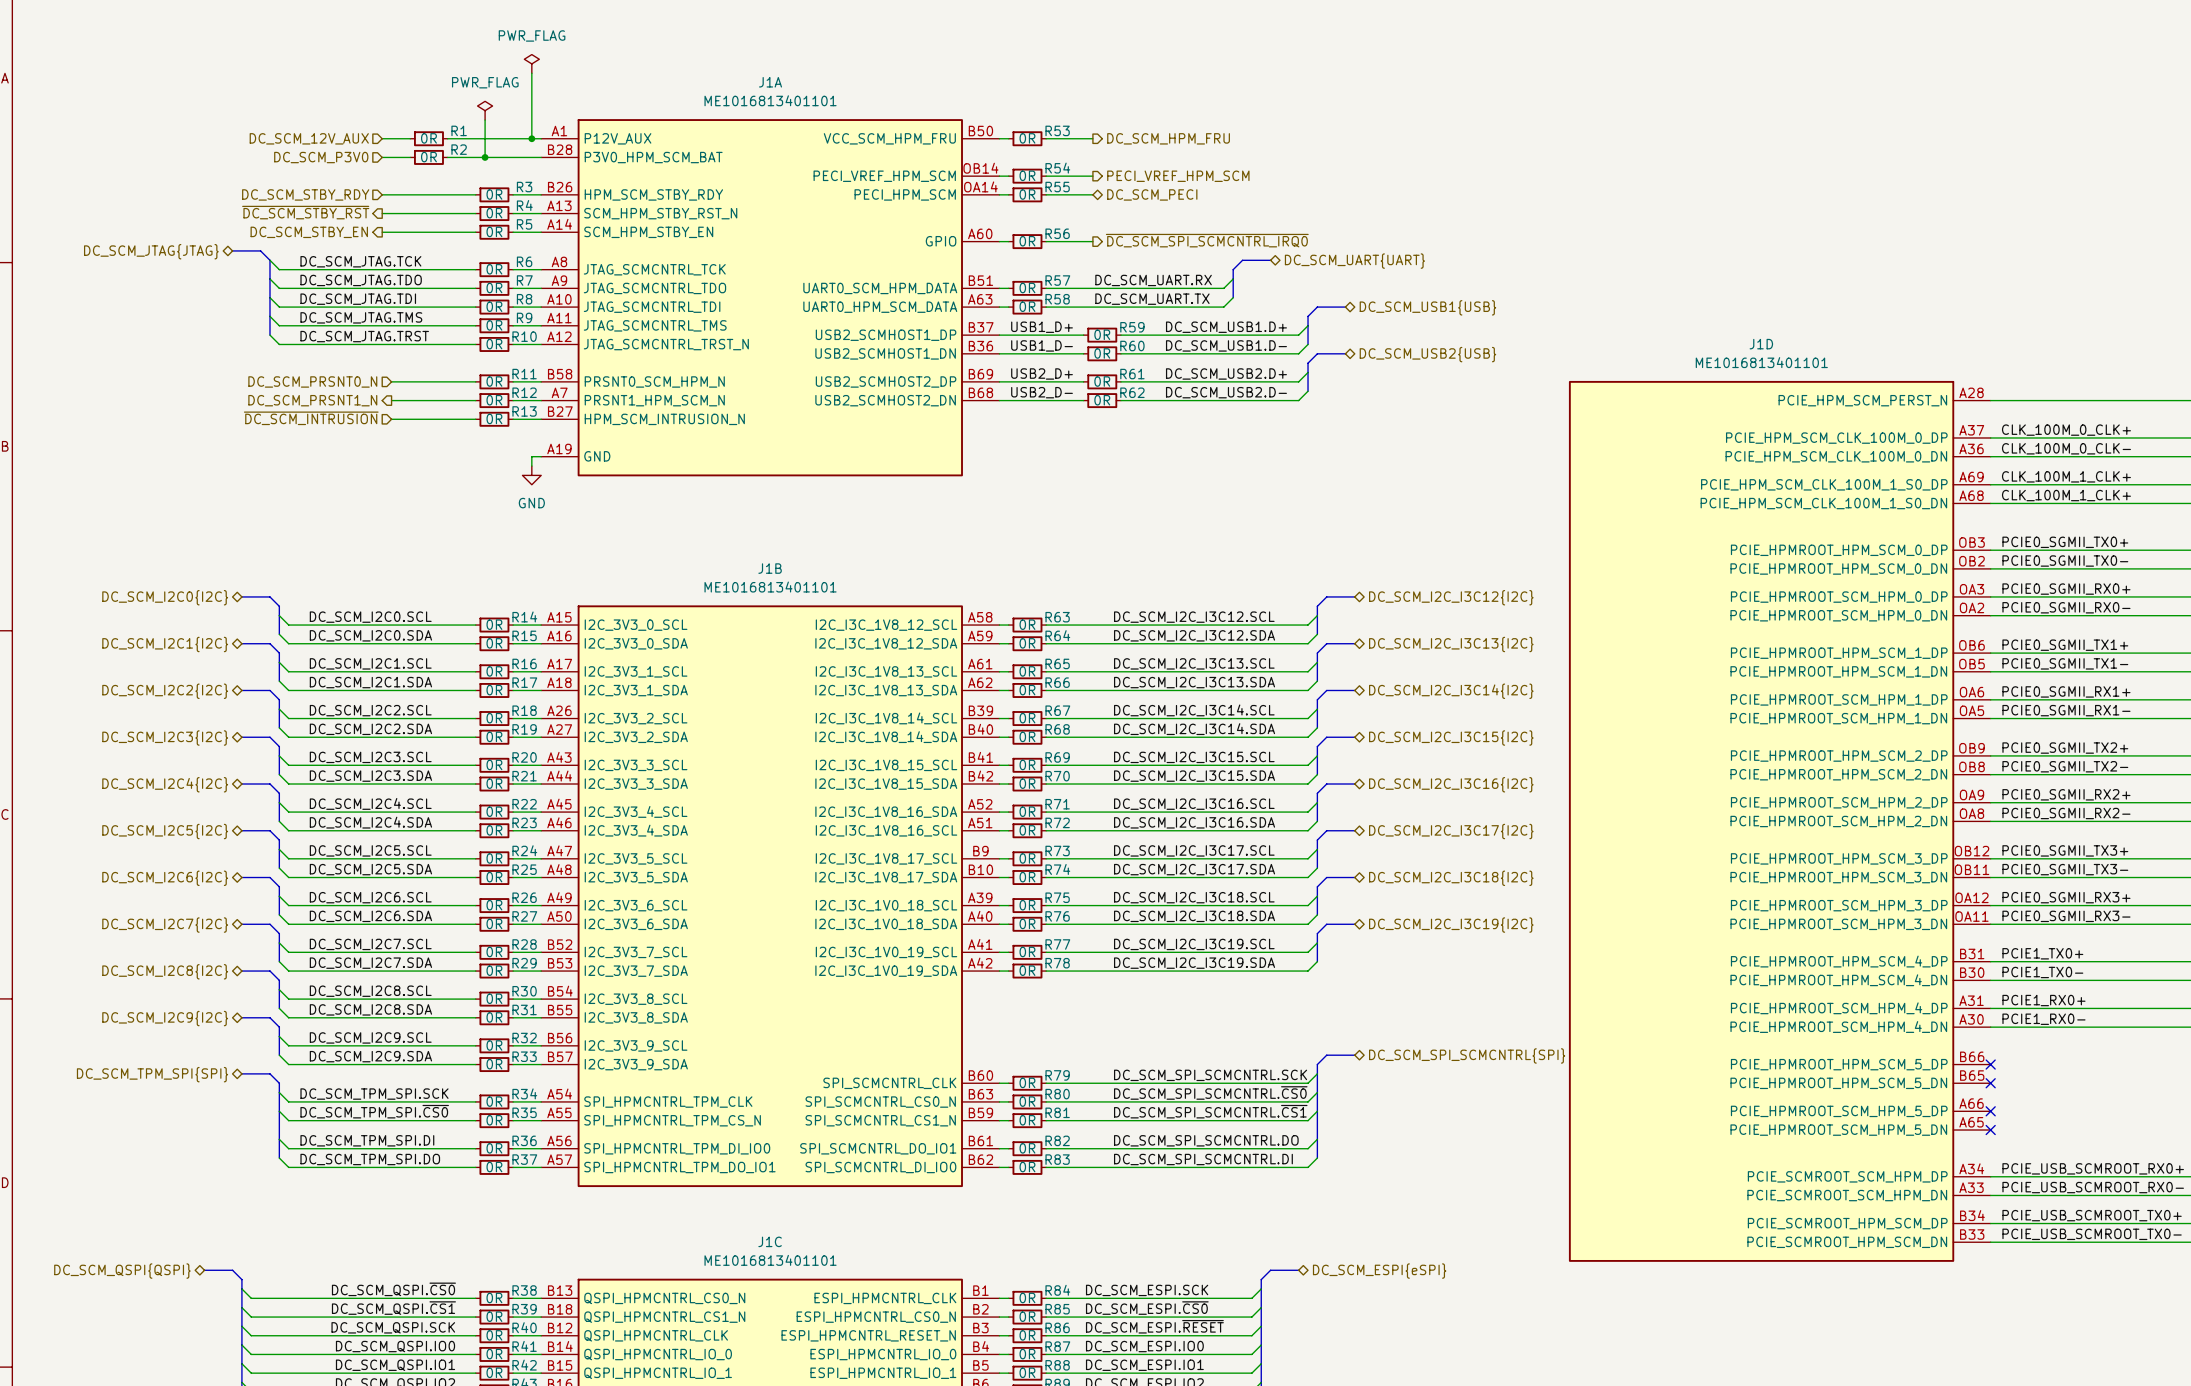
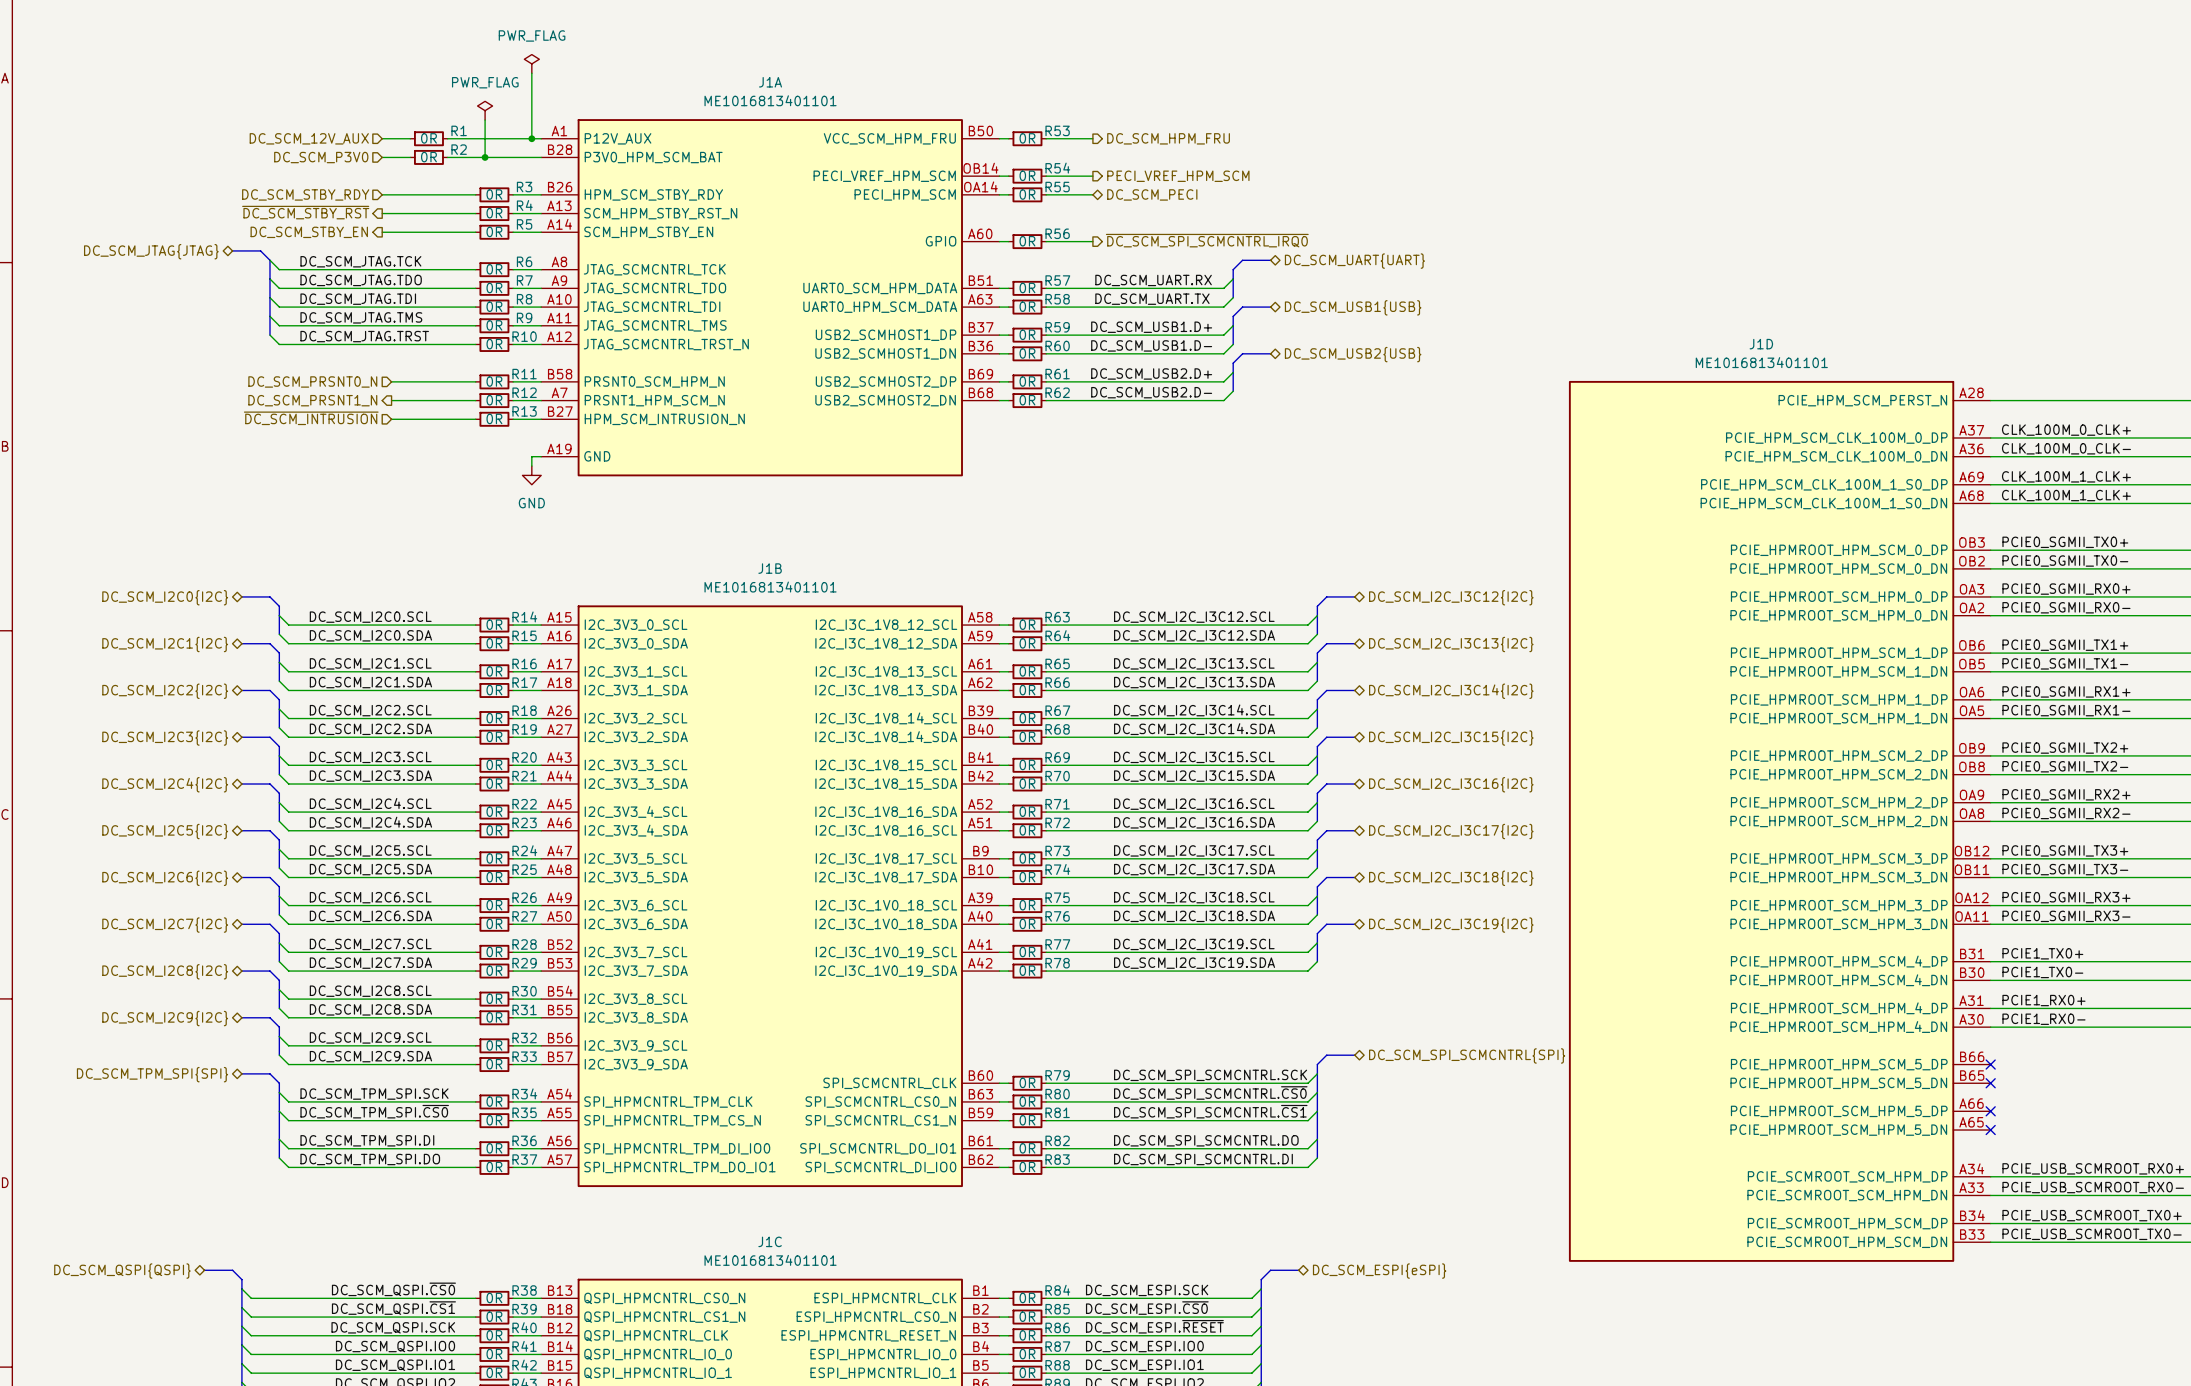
bus: (1345, 307) (1317, 307) (1308, 316) (1308, 344) -> (1270, 307) (1242, 307) (1233, 316) (1233, 344)
hierarchical label position: DC_SCM_USB1{USB} (1427, 307) -> DC_SCM_USB1{USB} (1353, 307)
wire: (1308, 325) (1298, 335) (1223, 335) -> (1233, 325) (1223, 335)
label: USB1_D+ (1042, 327) -> none
label position: DC_SCM_USB1.D+ (1226, 327) -> DC_SCM_USB1.D+ (1151, 327)
R59 position: (1102, 335) -> (1027, 335)
wire: (1308, 344) (1298, 353) (1223, 353) -> (1233, 344) (1223, 353)
label: USB1_D- (1042, 345) -> none
label position: DC_SCM_USB1.D- (1226, 345) -> DC_SCM_USB1.D- (1151, 345)
R60 position: (1102, 353) -> (1027, 353)
bus: (1345, 353) (1317, 353) (1308, 363) (1308, 391) -> (1270, 353) (1242, 353) (1233, 363) (1233, 391)
hierarchical label position: DC_SCM_USB2{USB} (1427, 354) -> DC_SCM_USB2{USB} (1353, 354)
wire: (1308, 372) (1298, 381) (1223, 381) -> (1233, 372) (1223, 381)
label: USB2_D+ (1042, 373) -> none
label position: DC_SCM_USB2.D+ (1226, 373) -> DC_SCM_USB2.D+ (1151, 373)
R61 position: (1102, 381) -> (1027, 381)
wire: (1308, 391) (1298, 400) (1223, 400) -> (1233, 391) (1223, 400)
label: USB2_D- (1042, 392) -> none
label position: DC_SCM_USB2.D- (1226, 392) -> DC_SCM_USB2.D- (1151, 392)
R62 position: (1102, 400) -> (1027, 400)

